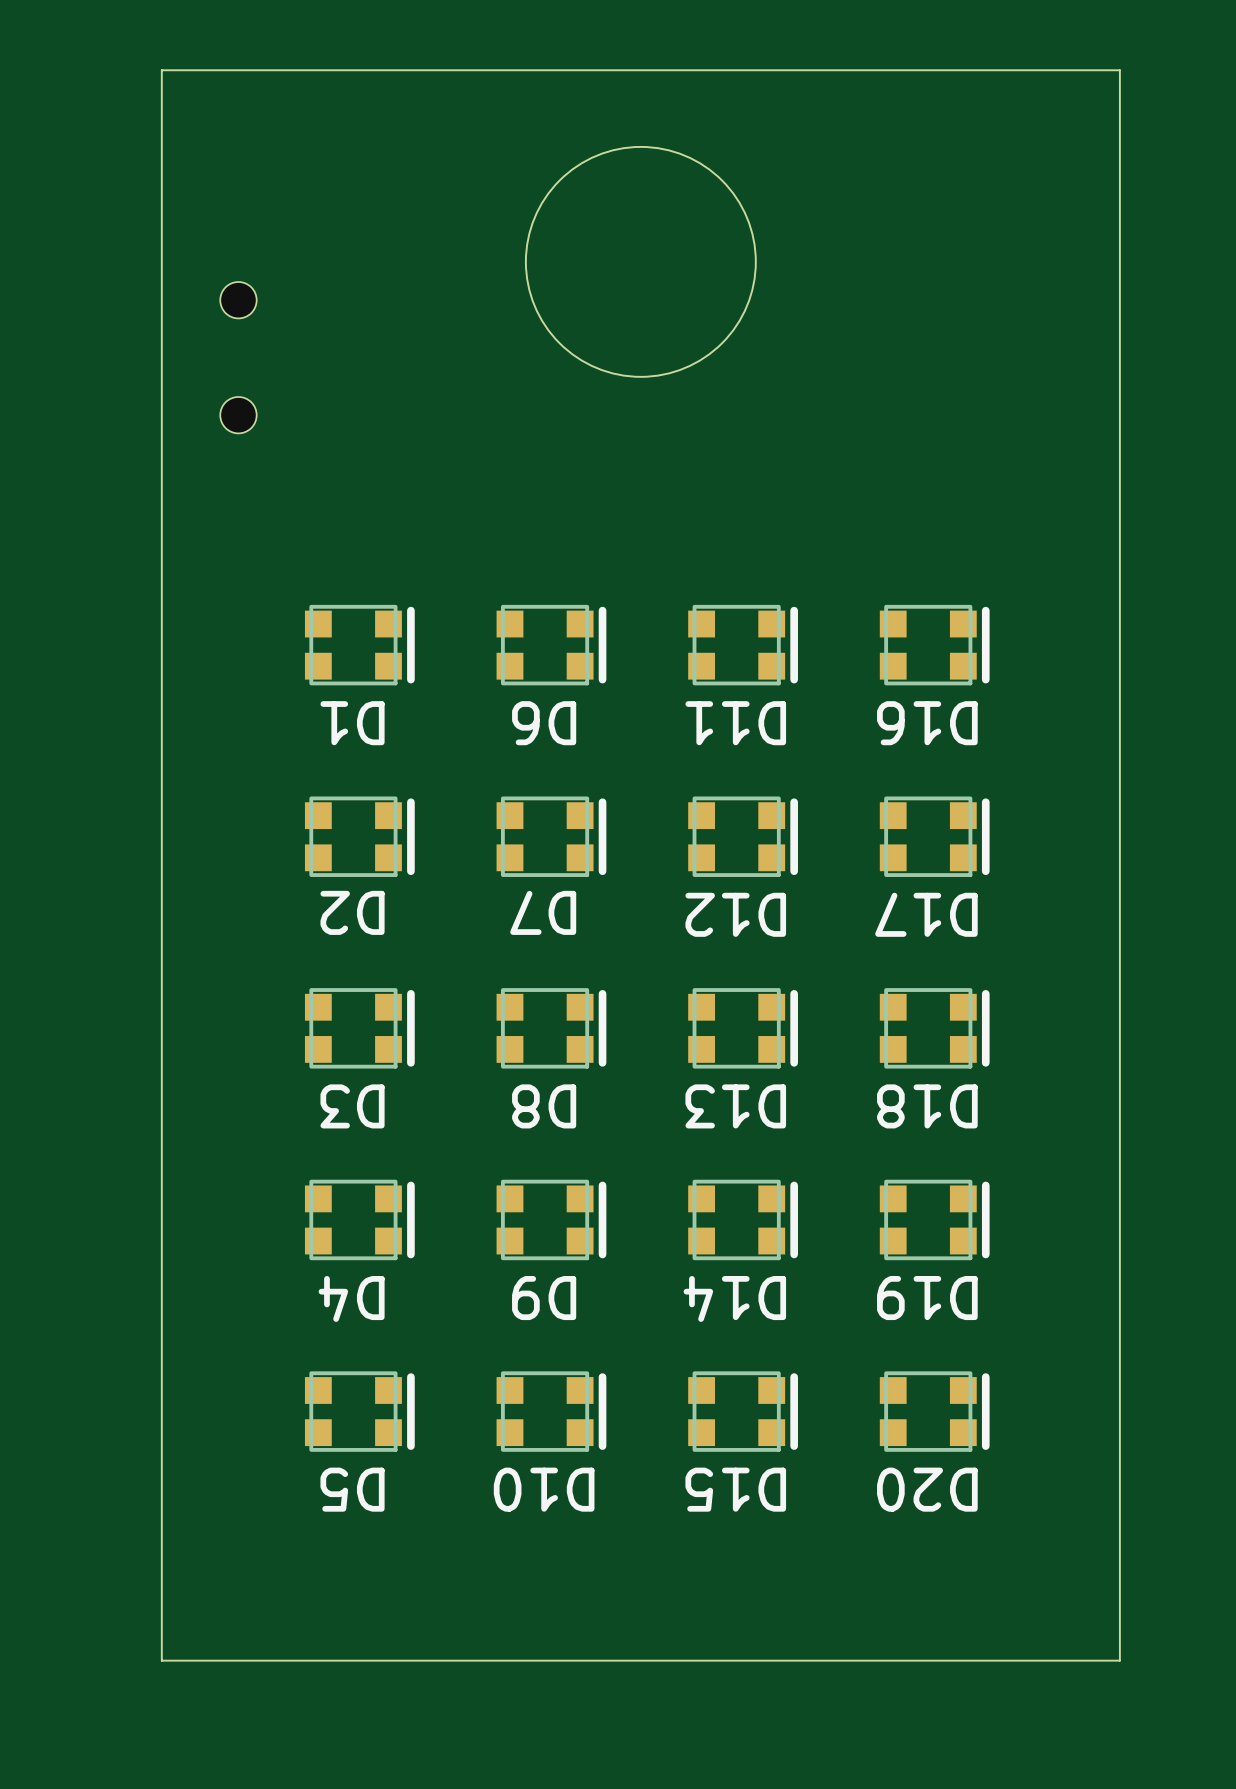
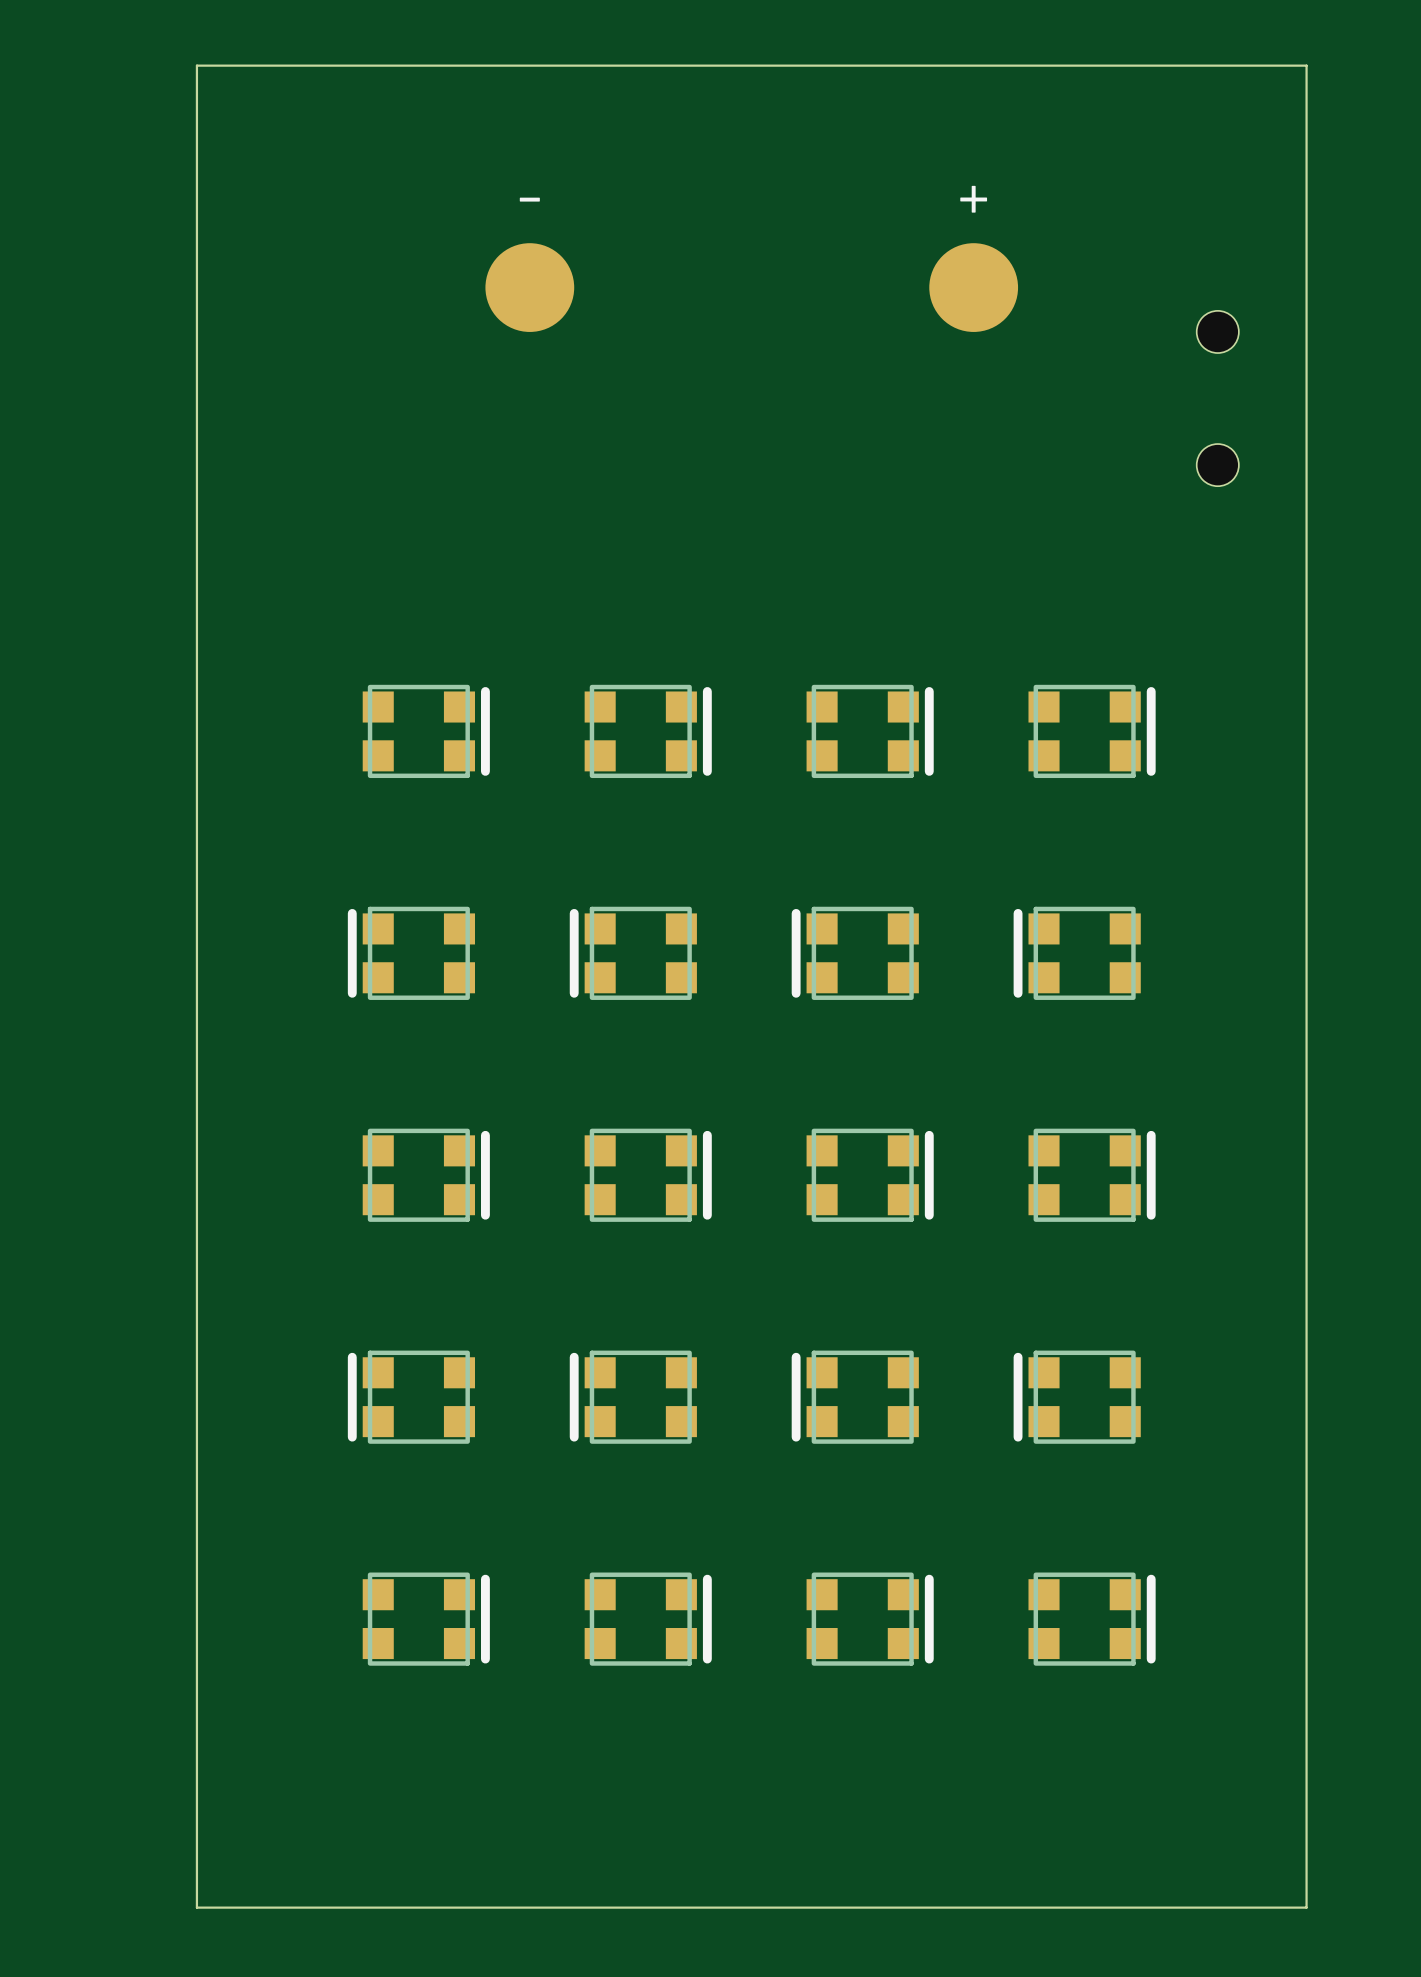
round board edge: [524, 145, 757, 378] -> none
part: none -> - (529, 287)
part: none -> + (973, 287)
part position: (238, 357) -> (1217, 398)
D1 name: D1 (352, 723) -> none
D6 name: D6 (544, 723) -> none
D11 name: D11 (735, 723) -> none
D16 name: D16 (927, 723) -> none
part: none -> (411, 953)
D2: (359, 836) -> none
part: none -> (633, 953)
D7: (551, 836) -> none
part: none -> (855, 953)
D12: (743, 836) -> none
part: none -> (1077, 953)
D17: (934, 836) -> none
D3 name: D3 (352, 1106) -> none
D8 name: D8 (544, 1106) -> none
D13 name: D13 (735, 1106) -> none
D18 name: D18 (927, 1106) -> none
part: none -> (411, 1397)
D4: (359, 1219) -> none
part: none -> (633, 1397)
D9: (551, 1219) -> none
part: none -> (855, 1397)
D14: (743, 1219) -> none
part: none -> (1077, 1397)
D19: (934, 1219) -> none
D5 name: D5 (352, 1489) -> none
D10 name: D10 (544, 1489) -> none
D15 name: D15 (735, 1489) -> none
D20 name: D20 (927, 1489) -> none

